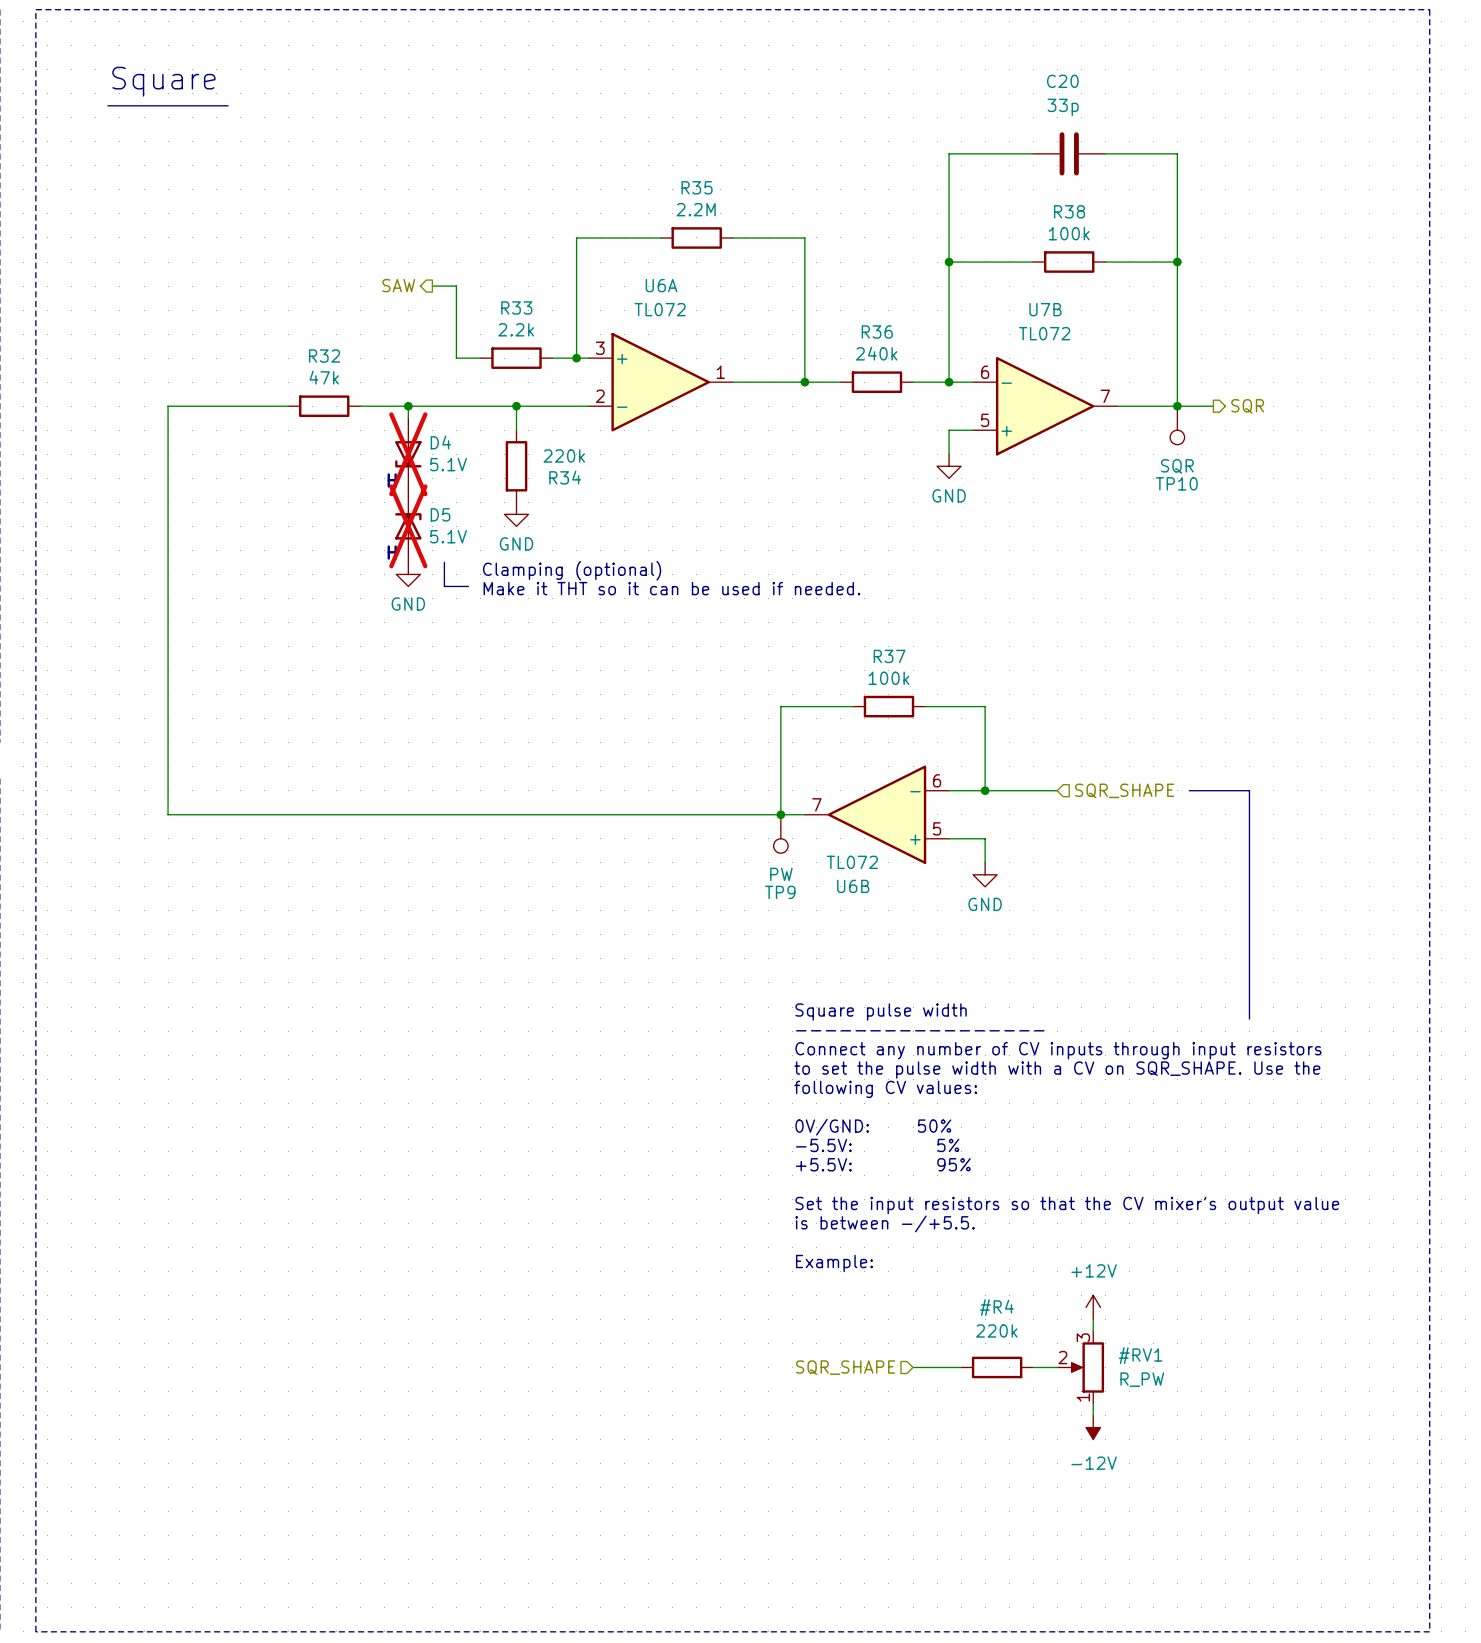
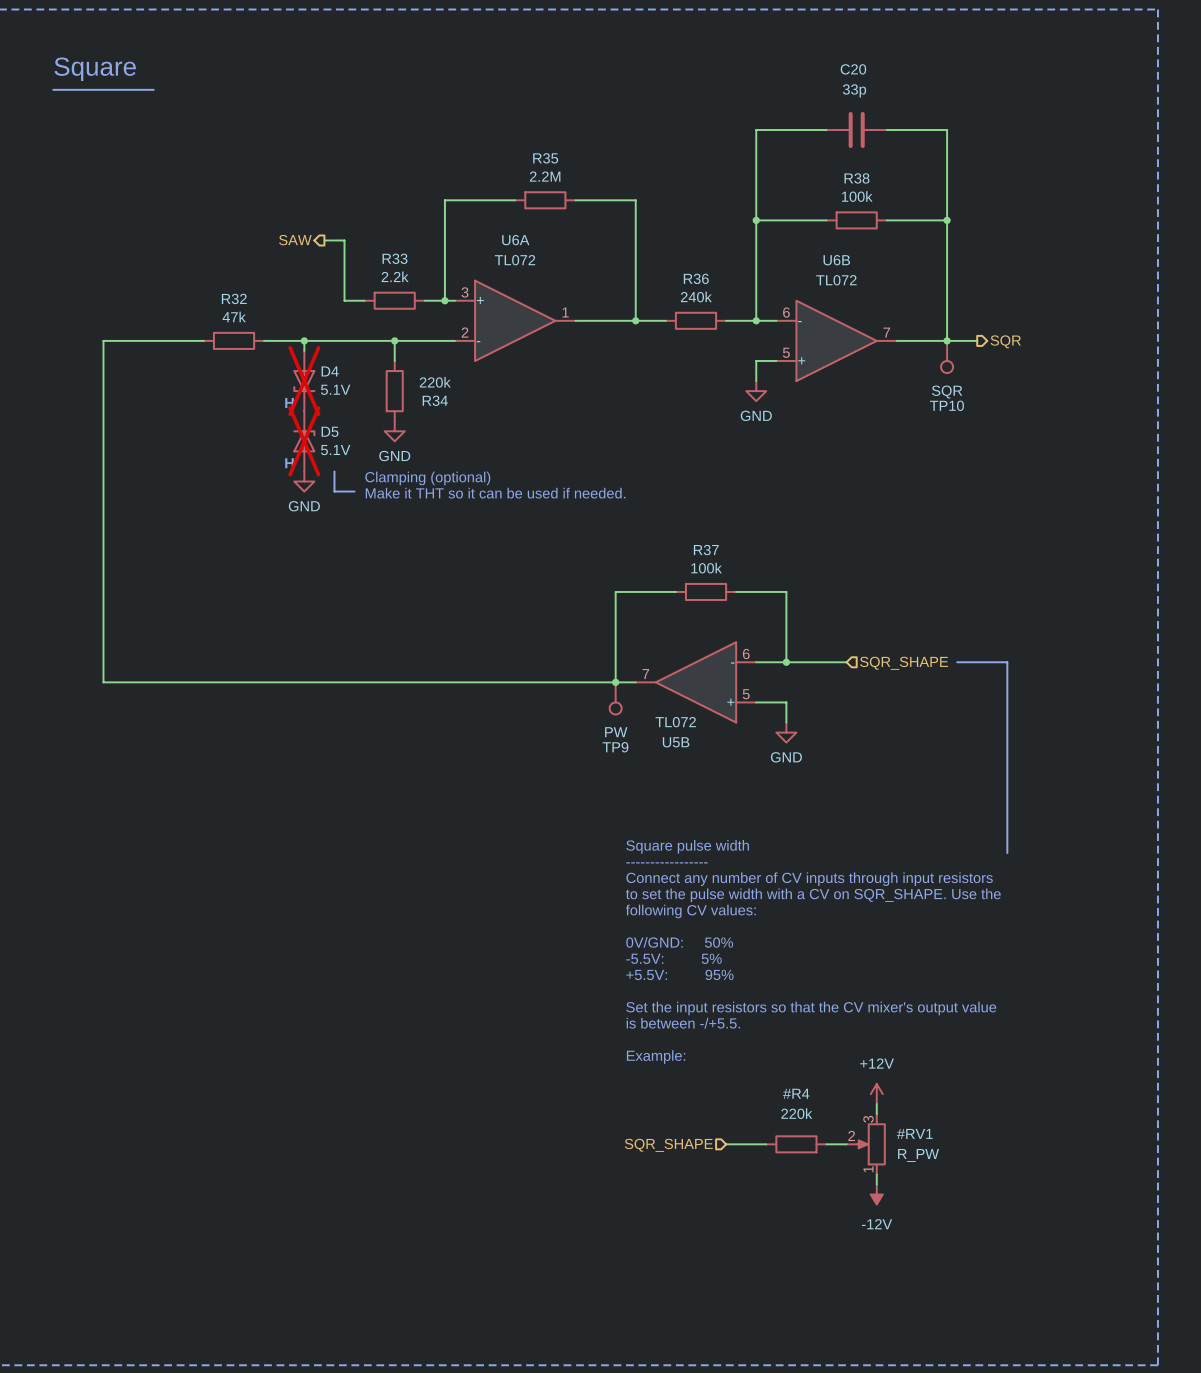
U7B name: U7B (1045, 309) -> U6B (836, 260)
U6B name: U6B (853, 886) -> U5B (676, 742)

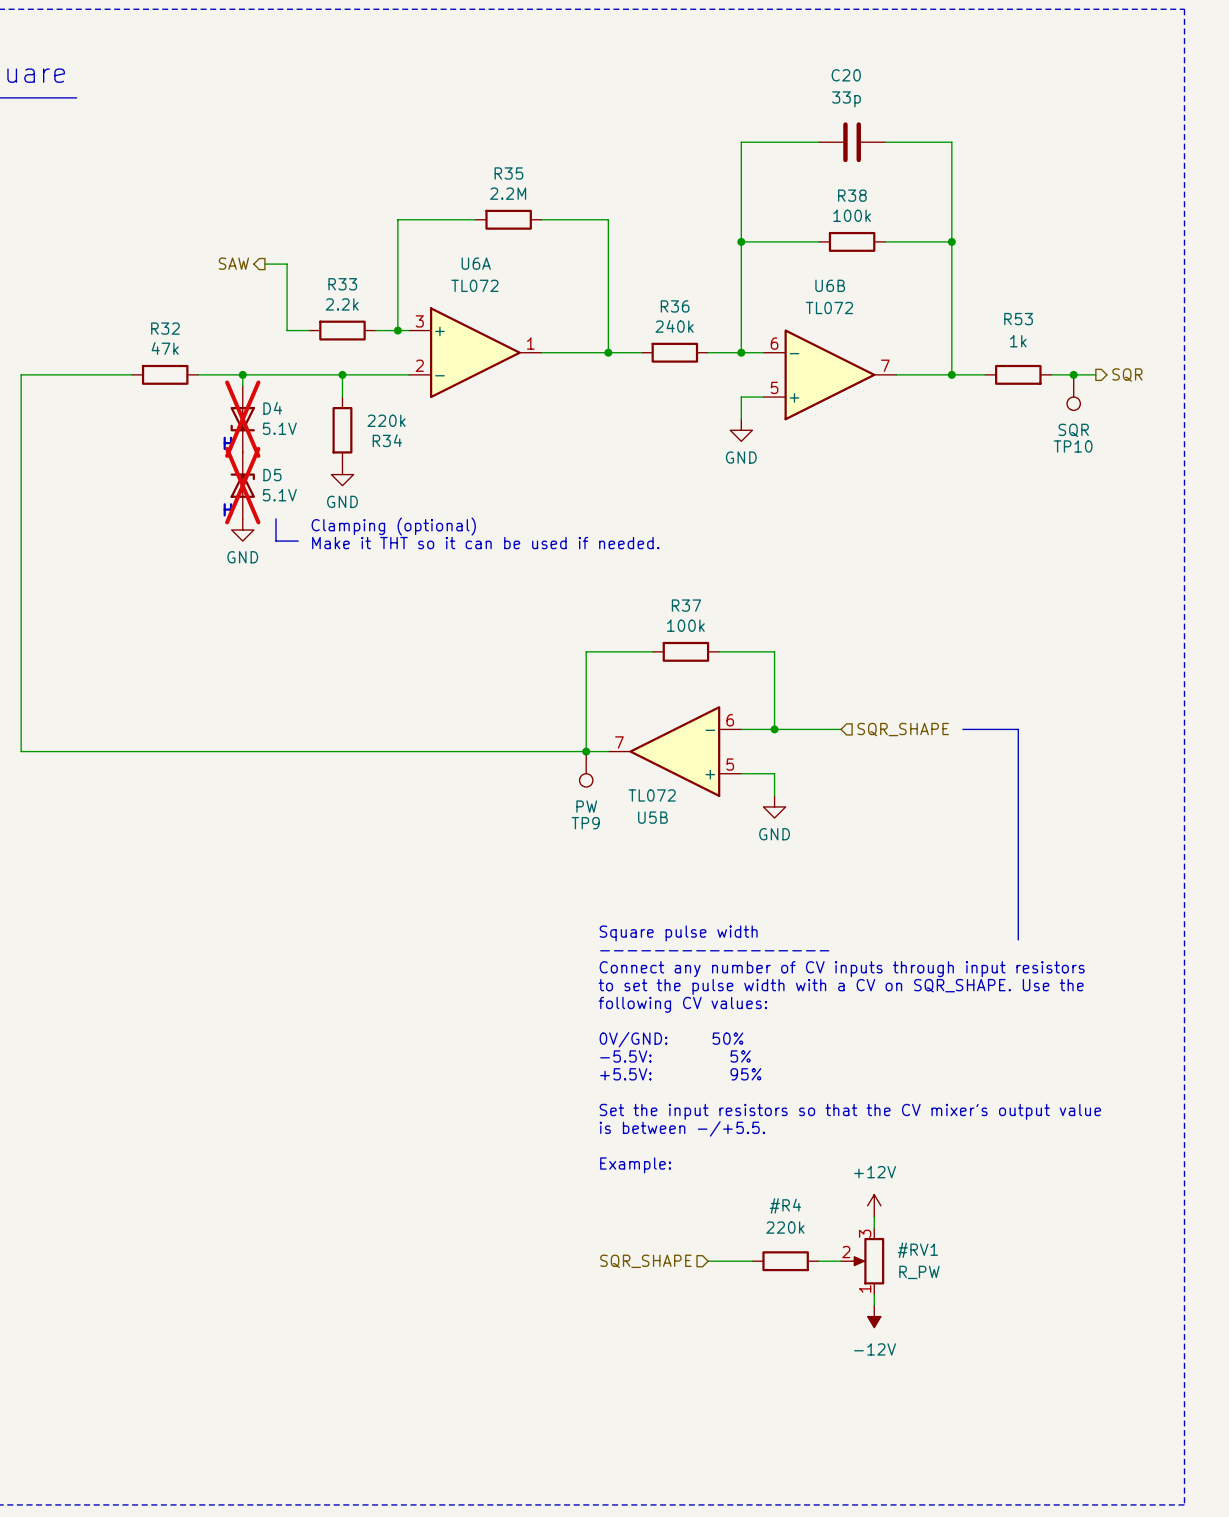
R53: none -> 1k (1018, 374)
wire: none -> (1051, 374) (1095, 374)
junction: none -> (1073, 374)
hierarchical label position: SQR (1005, 341) -> SQR (1127, 374)
TP10 position: (947, 356) -> (1073, 392)

